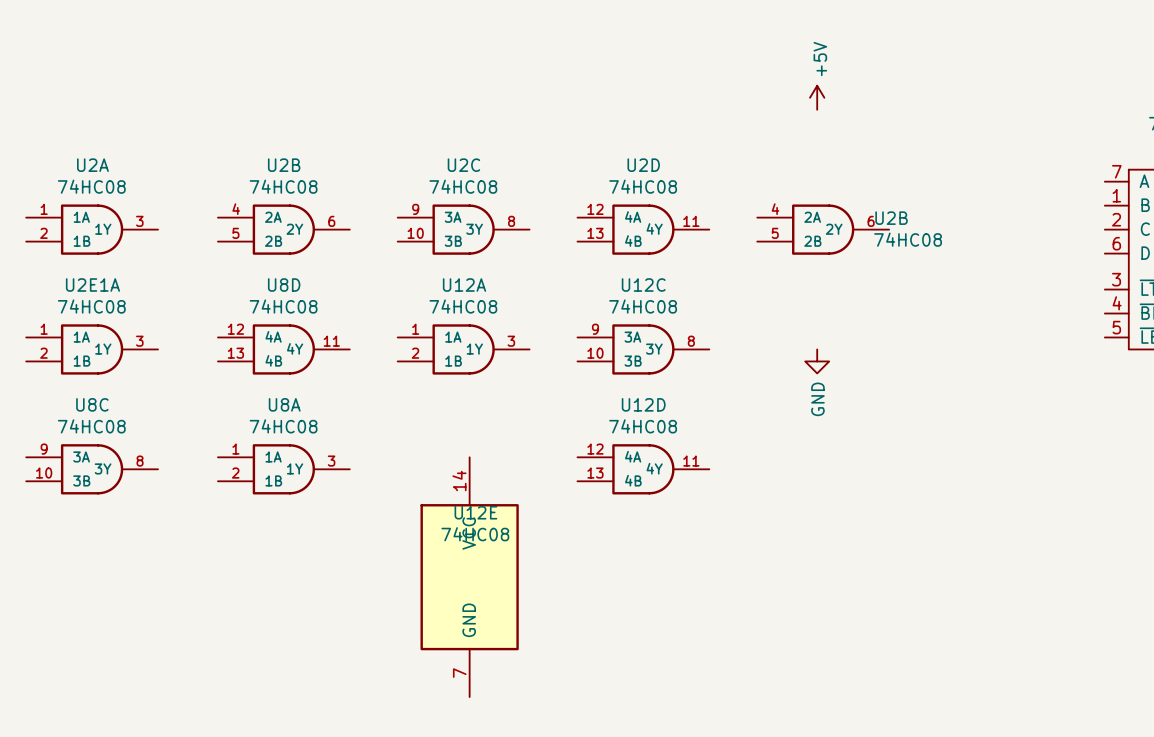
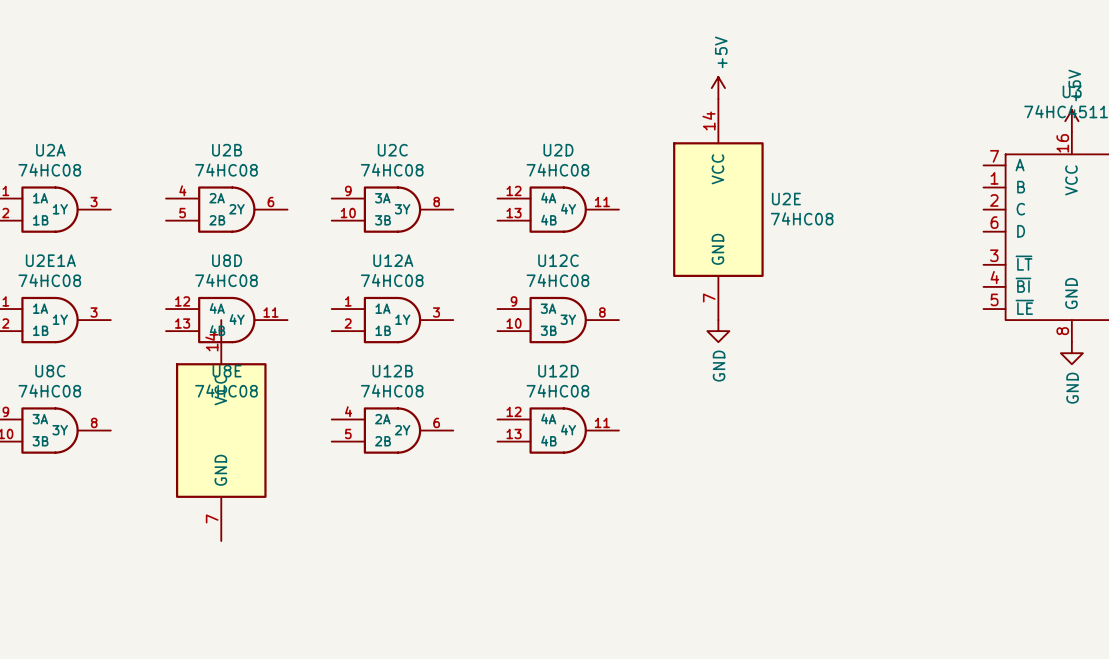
U2E: none -> 74HC08 (718, 209)
U2B: 74HC08 (823, 229) -> none
U8E: none -> 74HC08 (221, 430)
U8A: 74HC08 (283, 469) -> none
U12B: none -> 74HC08 (392, 430)
U12E: 74HC08 (469, 577) -> none

